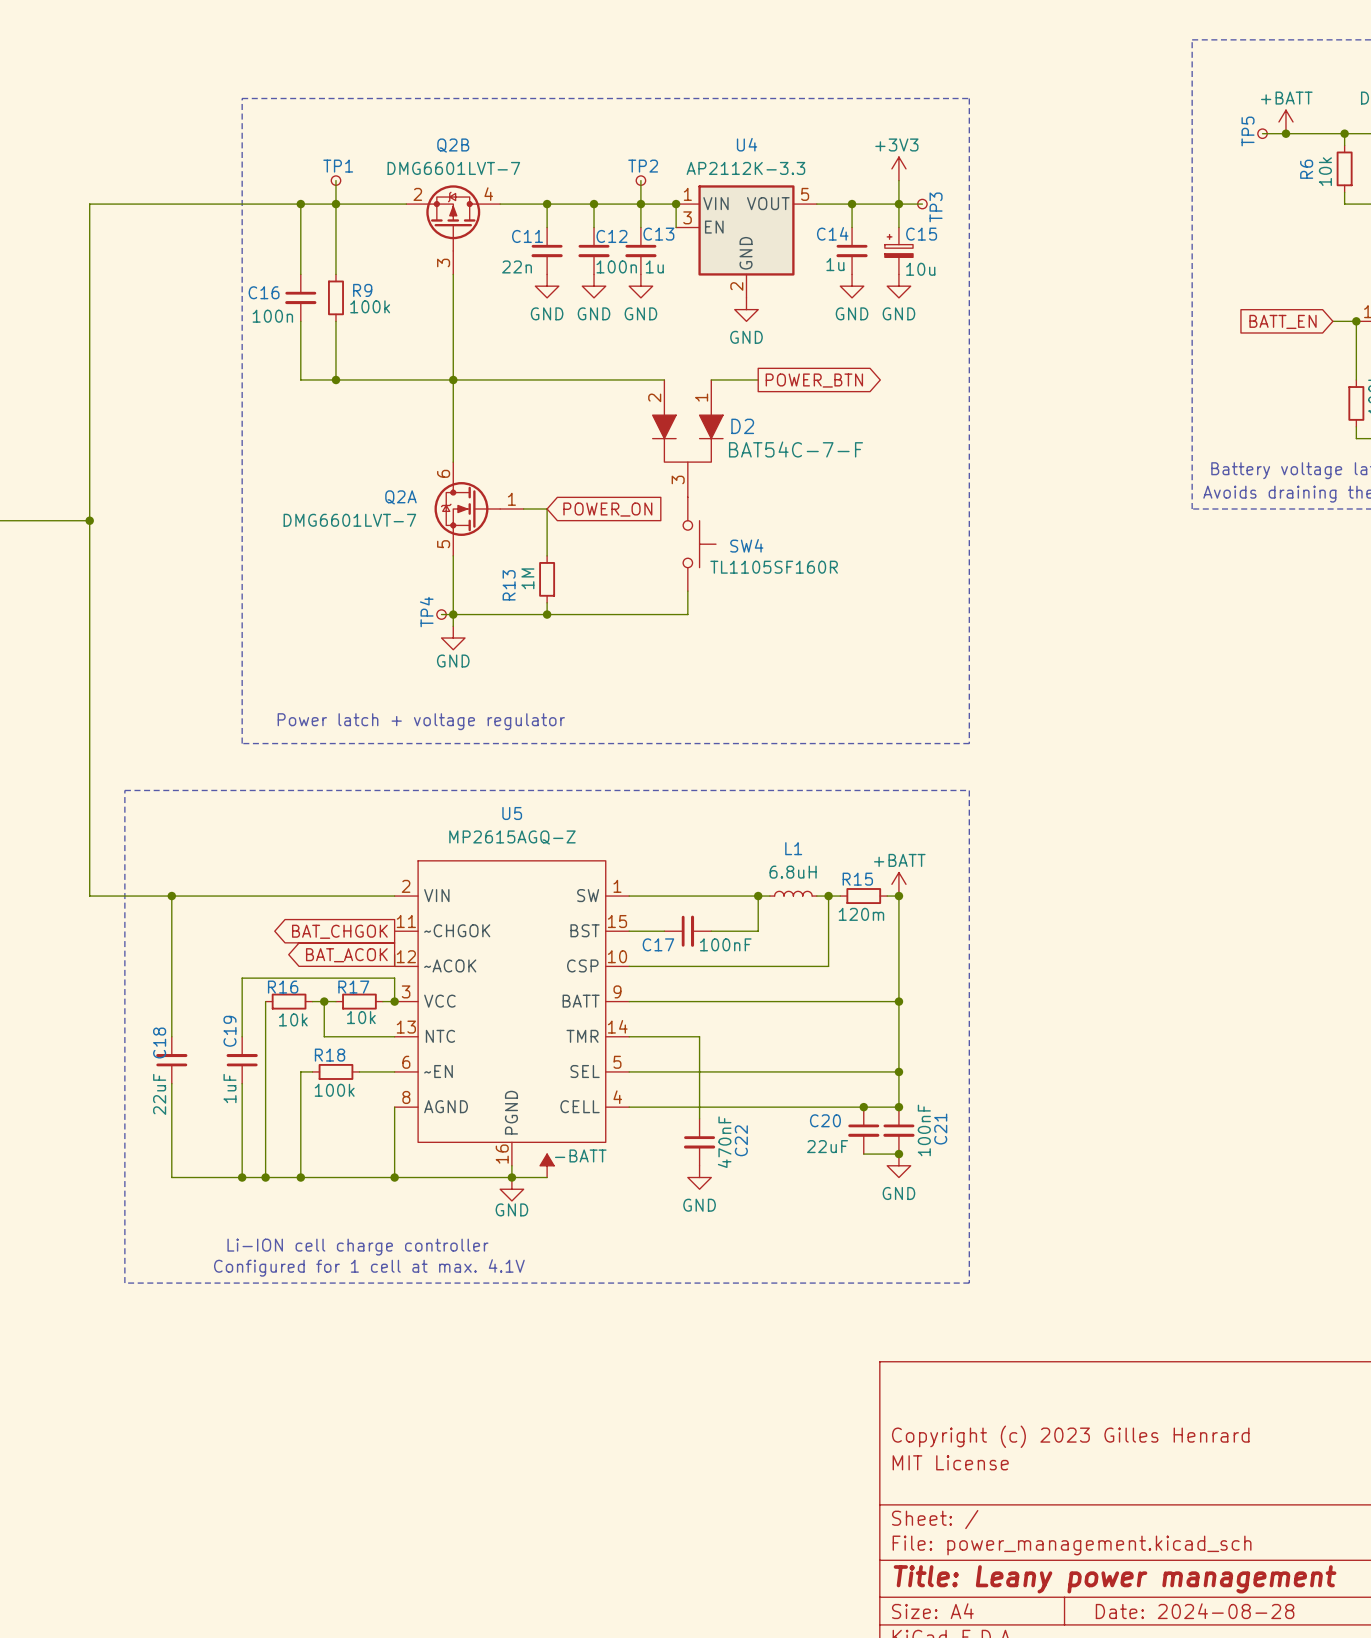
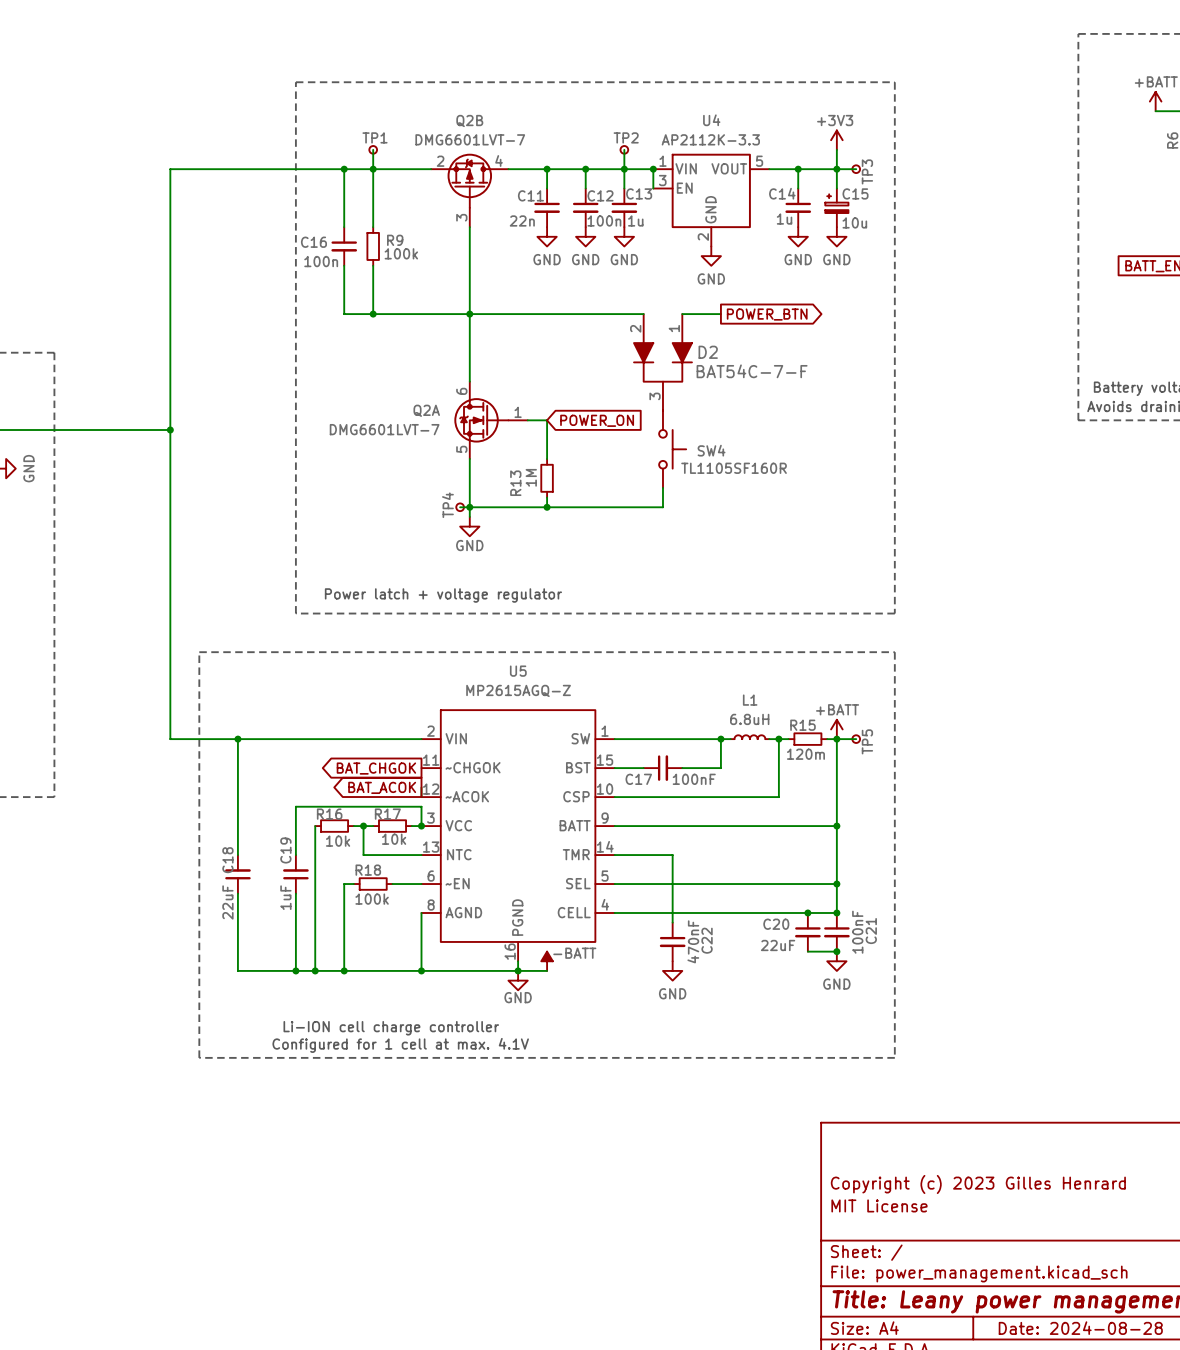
TP5 name position: TP5 (1248, 131) -> TP5 (867, 741)
wire: (1262, 133) (1285, 133) -> none
TP5 position: (1262, 133) -> (856, 739)
junction: (1285, 133) -> none
wire: none -> (836, 739) (856, 739)

